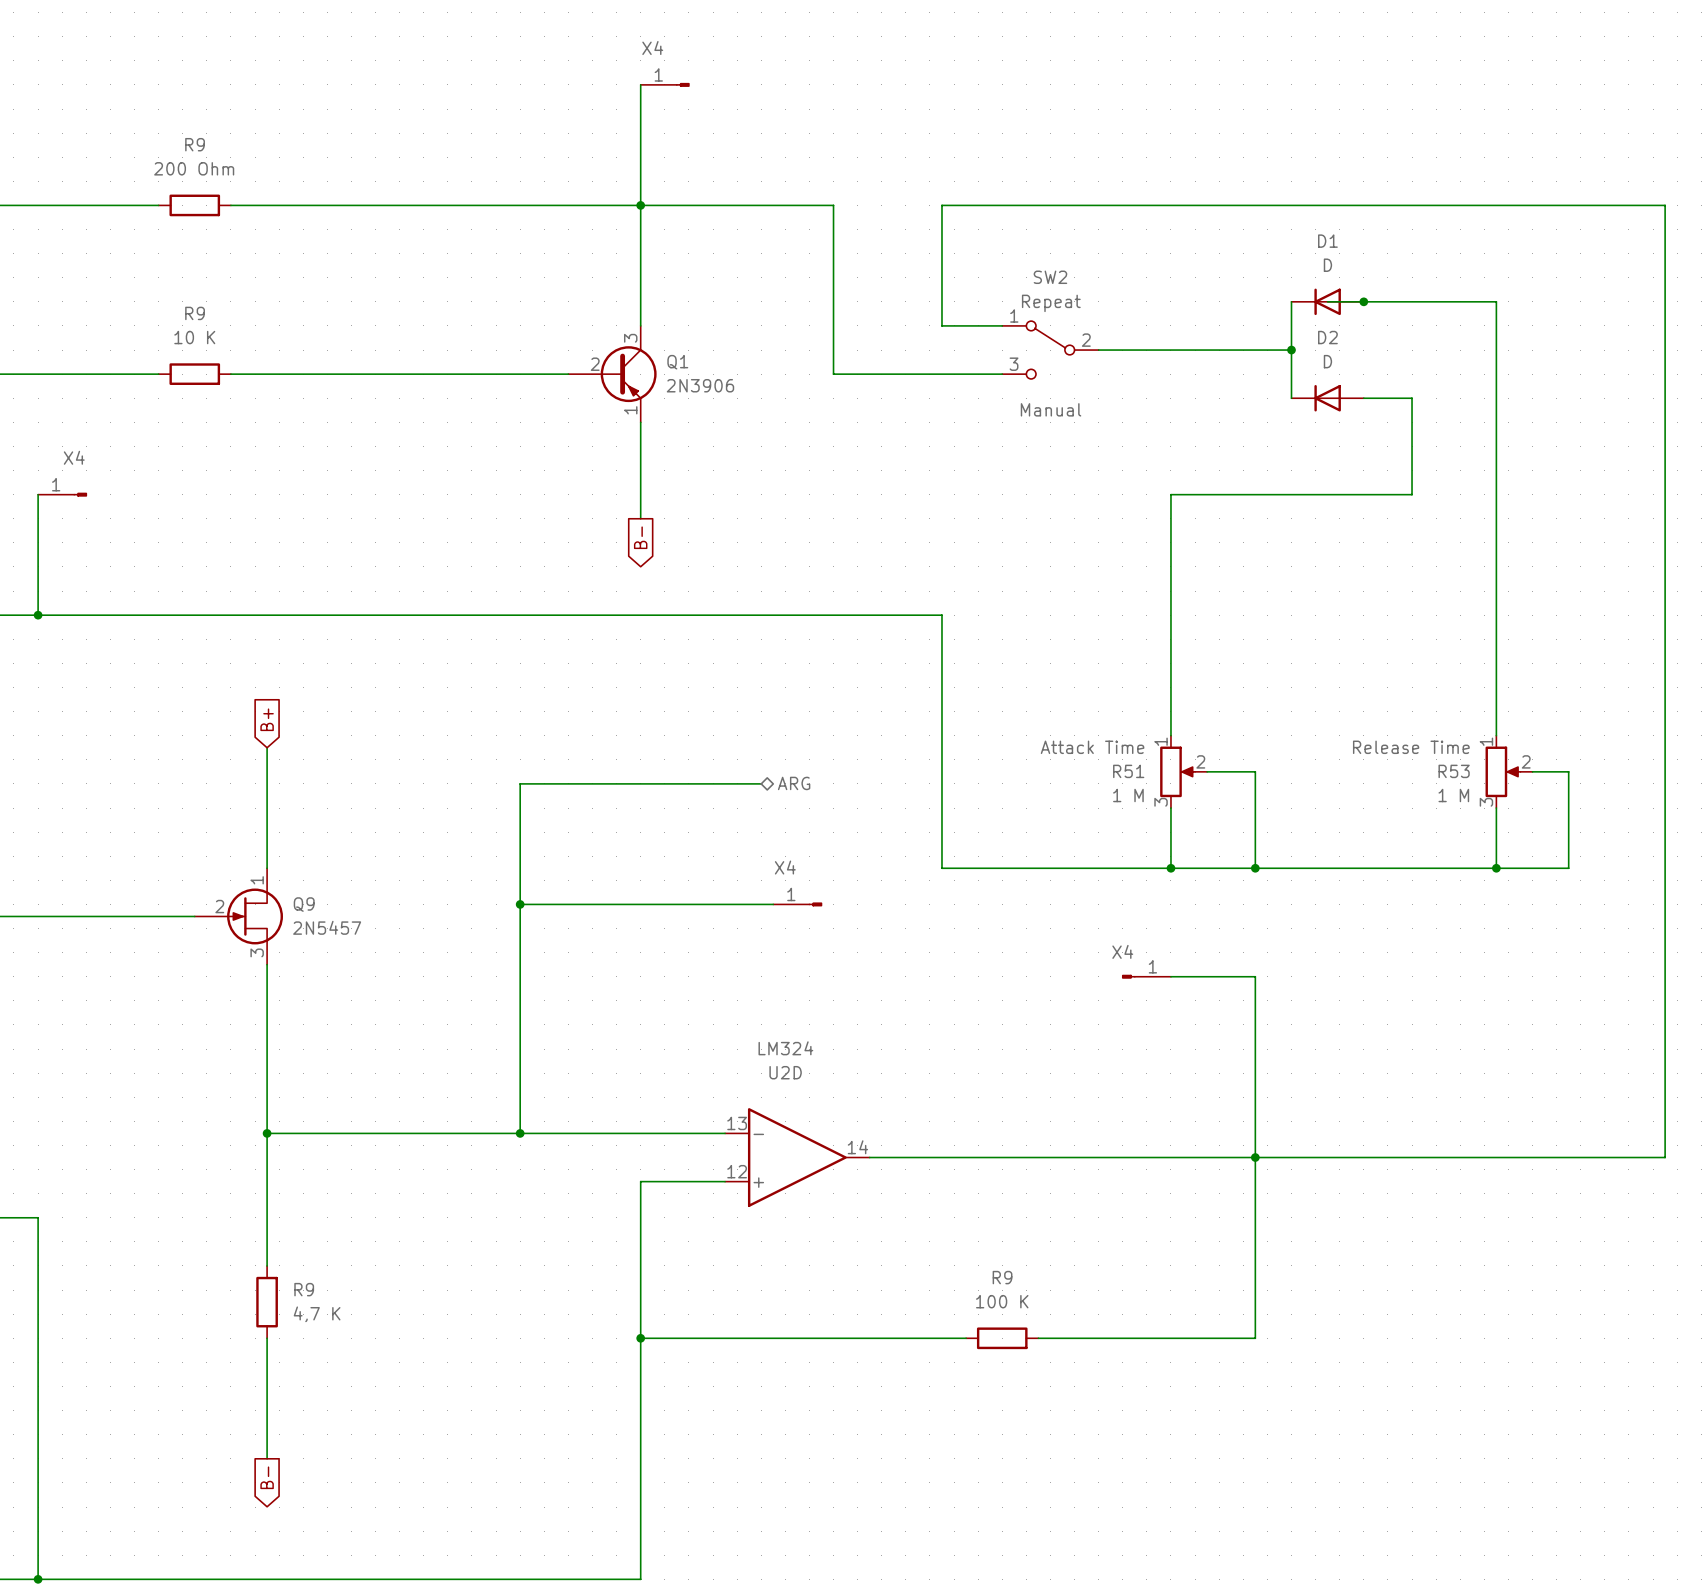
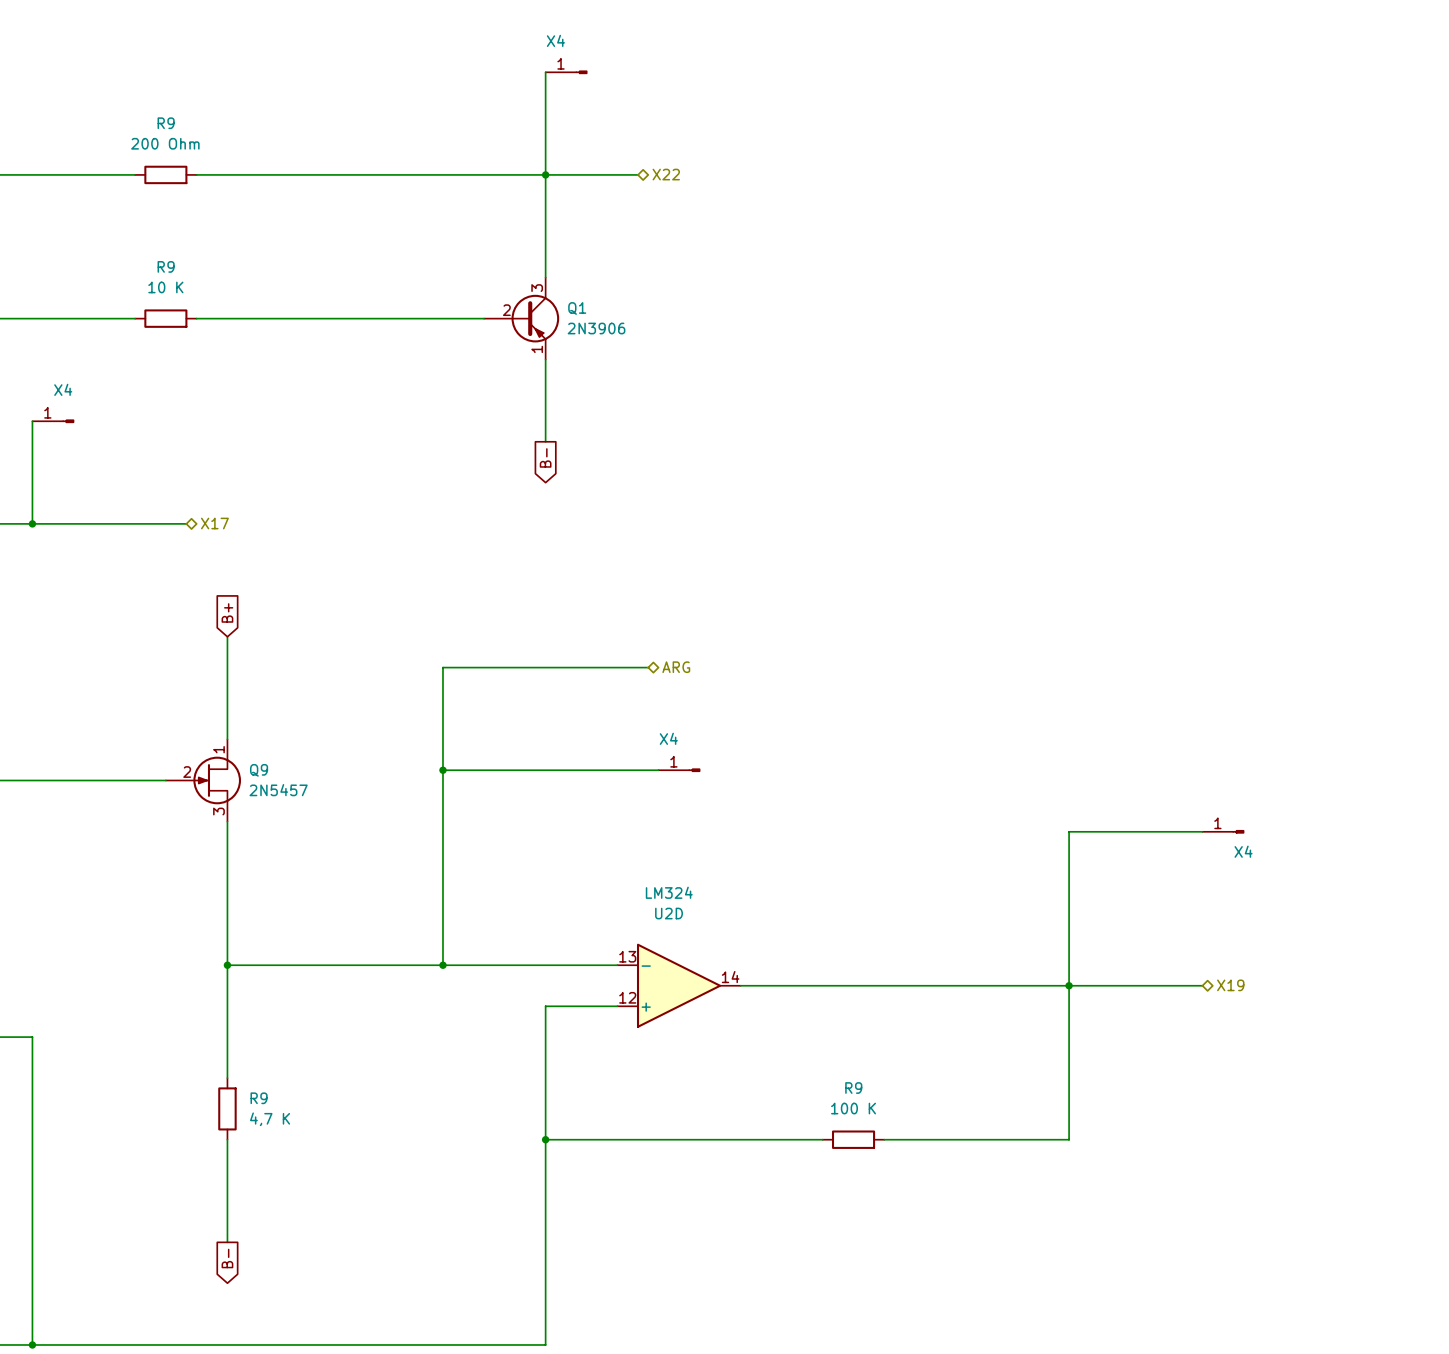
hierarchical label: none -> X22 (666, 174)
wire: (749, 205) (833, 205) (833, 374) (1002, 374) -> none
wire: (1291, 301) (1291, 398) -> none
wire: (1327, 301) (1496, 301) (1496, 735) -> none
D1: D (1327, 301) -> none
junction: (1363, 301) -> none
wire: (1002, 325) (941, 325) (941, 205) (1665, 205) (1665, 1157) (1412, 1157) -> none
SW2: Repeat (1050, 350) -> none
wire: (1098, 350) (1291, 350) -> none
junction: (1291, 350) -> none
D2: D (1327, 398) -> none
wire: (1363, 398) (1412, 398) (1412, 494) (1170, 494) (1170, 735) -> none
hierarchical label: none -> X17 (214, 523)
wire: (218, 615) (941, 615) (941, 868) (1568, 868) (1568, 771) (1532, 771) -> none
R51: 1 M (1183, 771) -> none
wire: (1207, 771) (1255, 771) (1255, 868) -> none
R53: 1 M (1509, 771) -> none
wire: (1170, 808) (1170, 868) -> none
wire: (1496, 808) (1496, 868) -> none
junction: (1170, 868) -> none
junction: (1255, 868) -> none
junction: (1496, 868) -> none
X4: (1146, 976) -> none
wire: (1170, 976) (1255, 976) -> (1202, 831) (1069, 831)
X4: none -> (1223, 831)
hierarchical label: none -> X19 (1230, 985)

